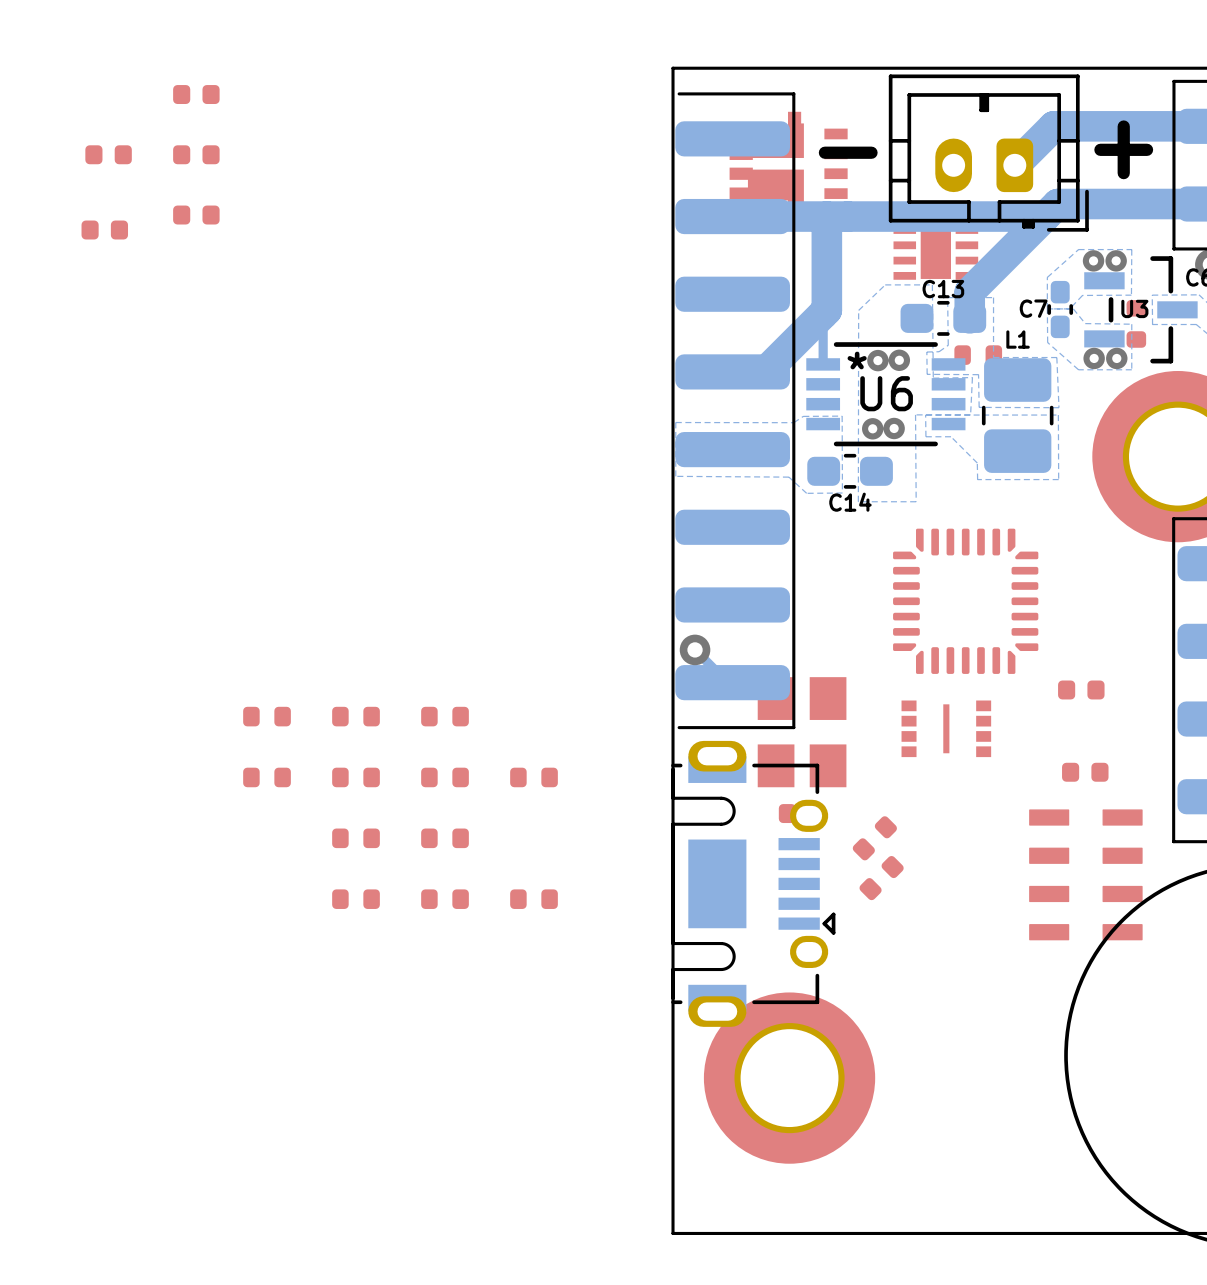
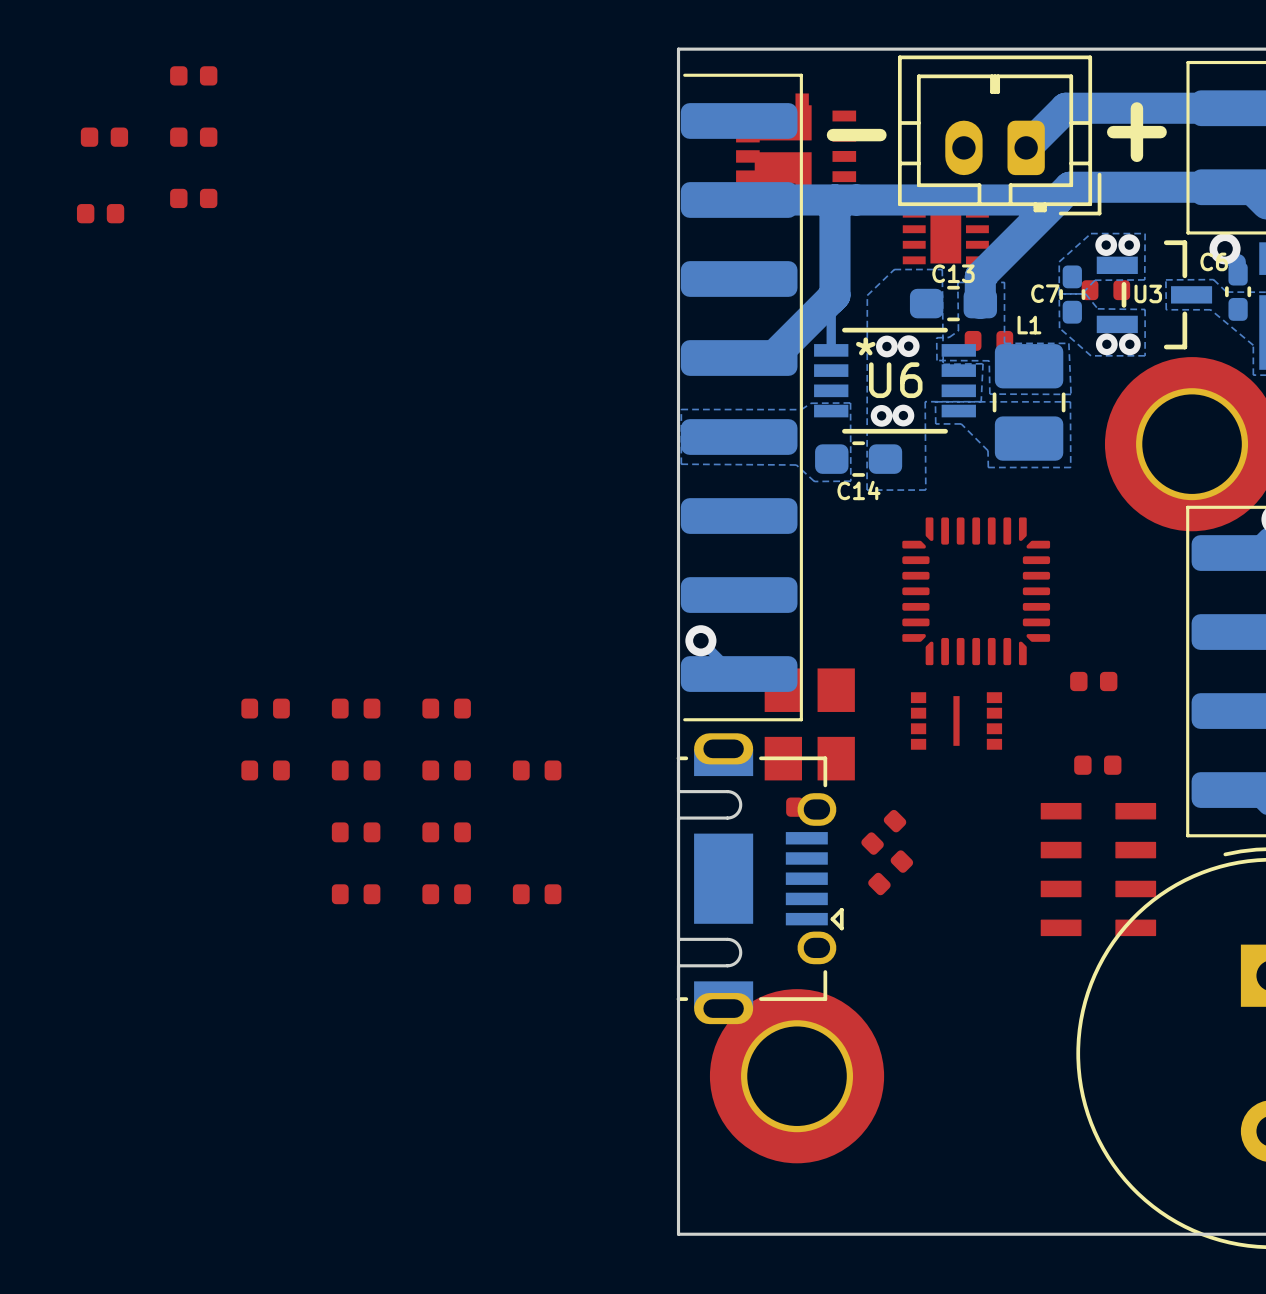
part rotation: 0° (1136, 323) -> 90° clockwise (1105, 290)
part position: (1136, 323) -> (1105, 290)

